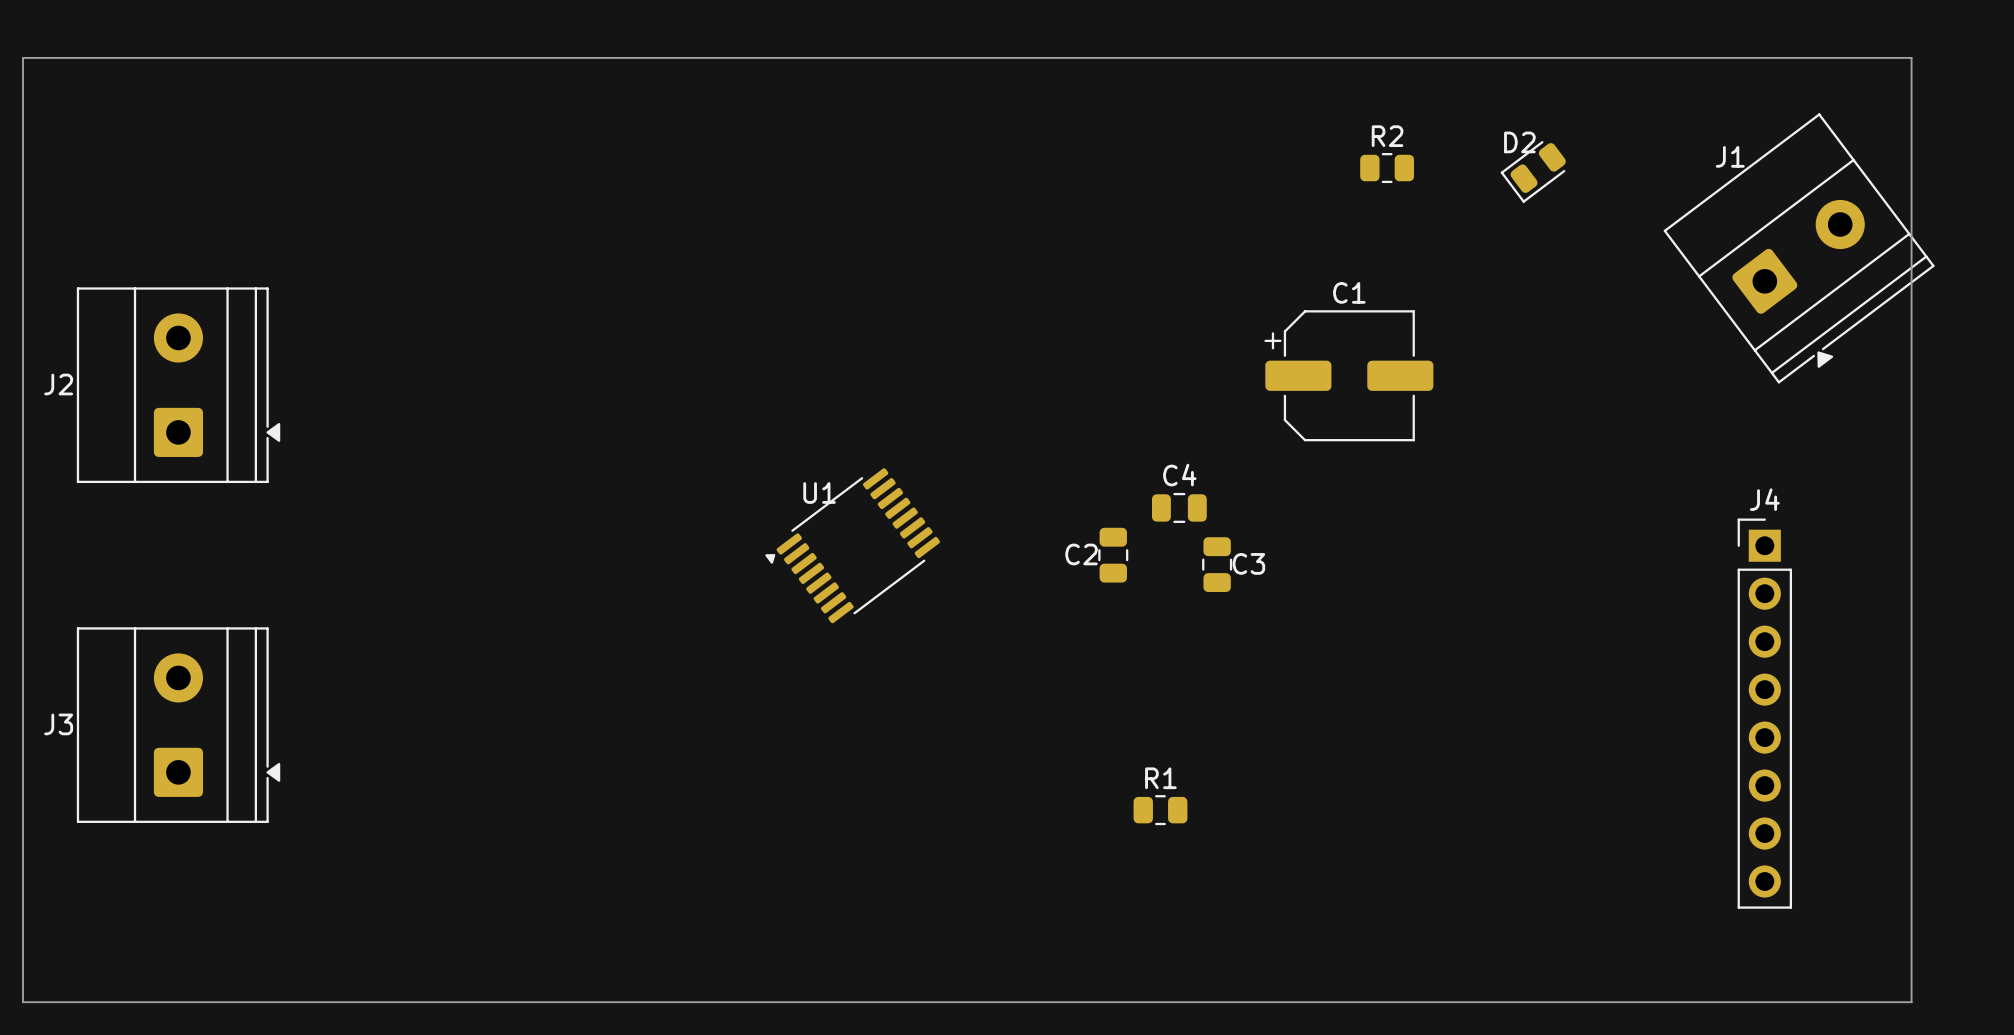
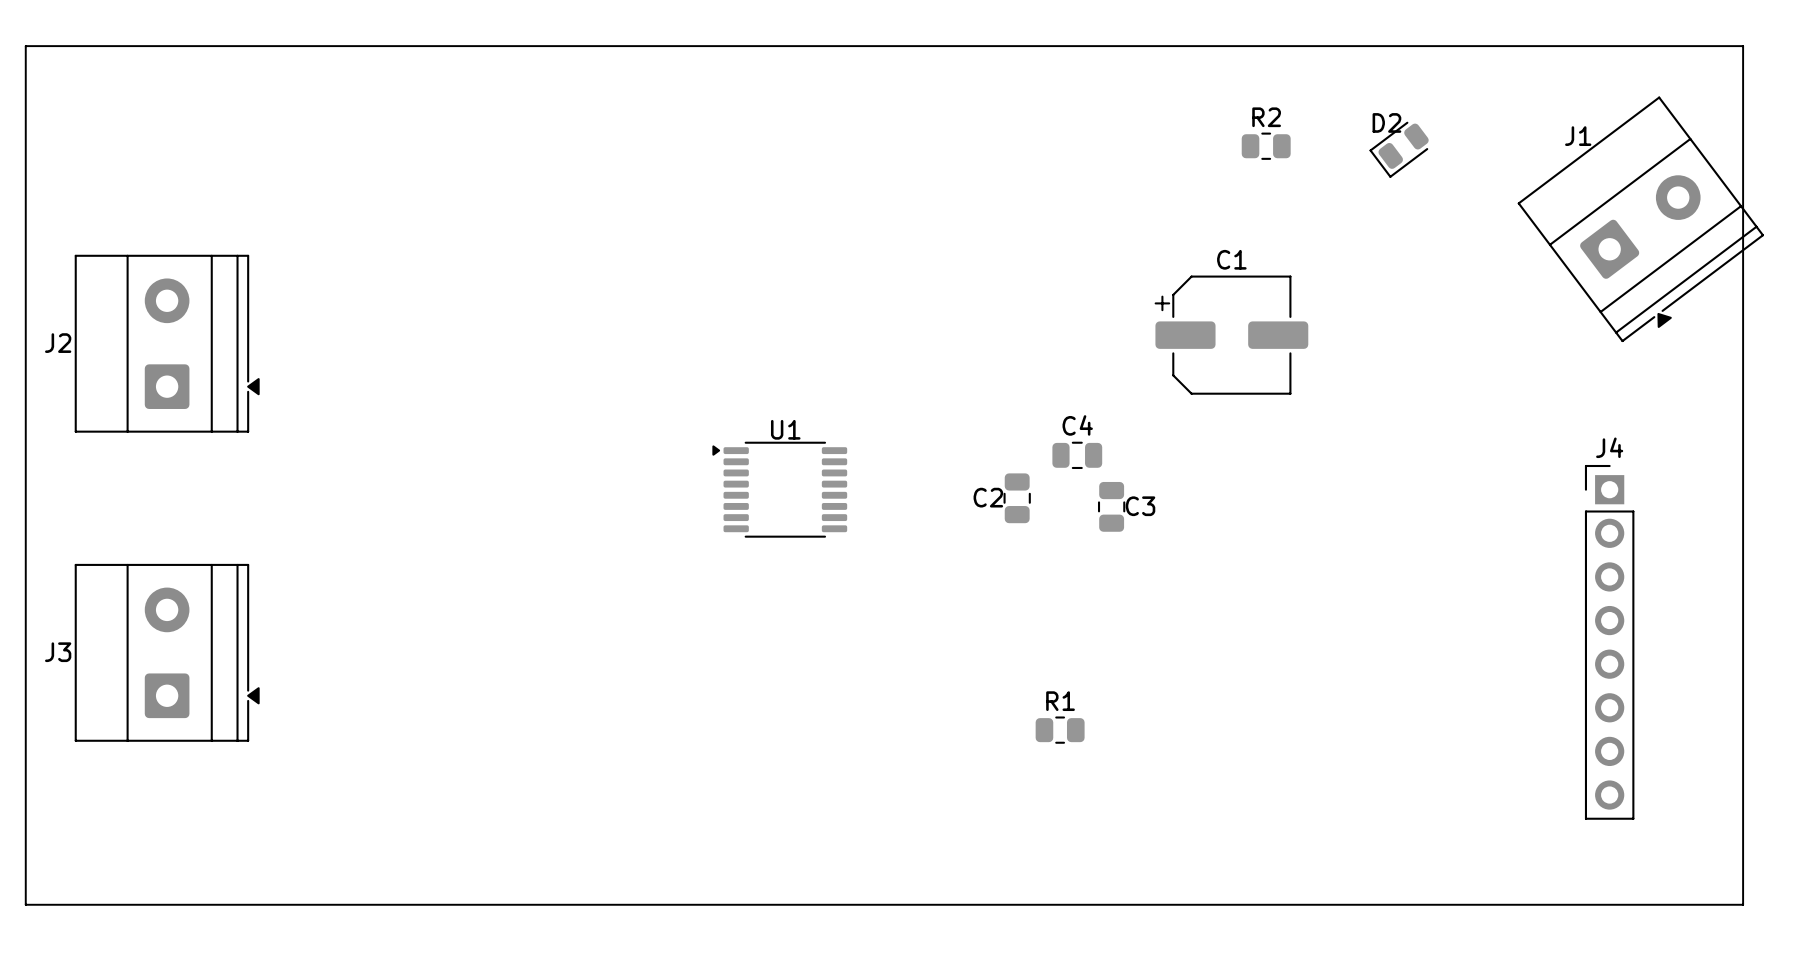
U1 rotation: 0° (852, 545) -> 37° clockwise (779, 489)

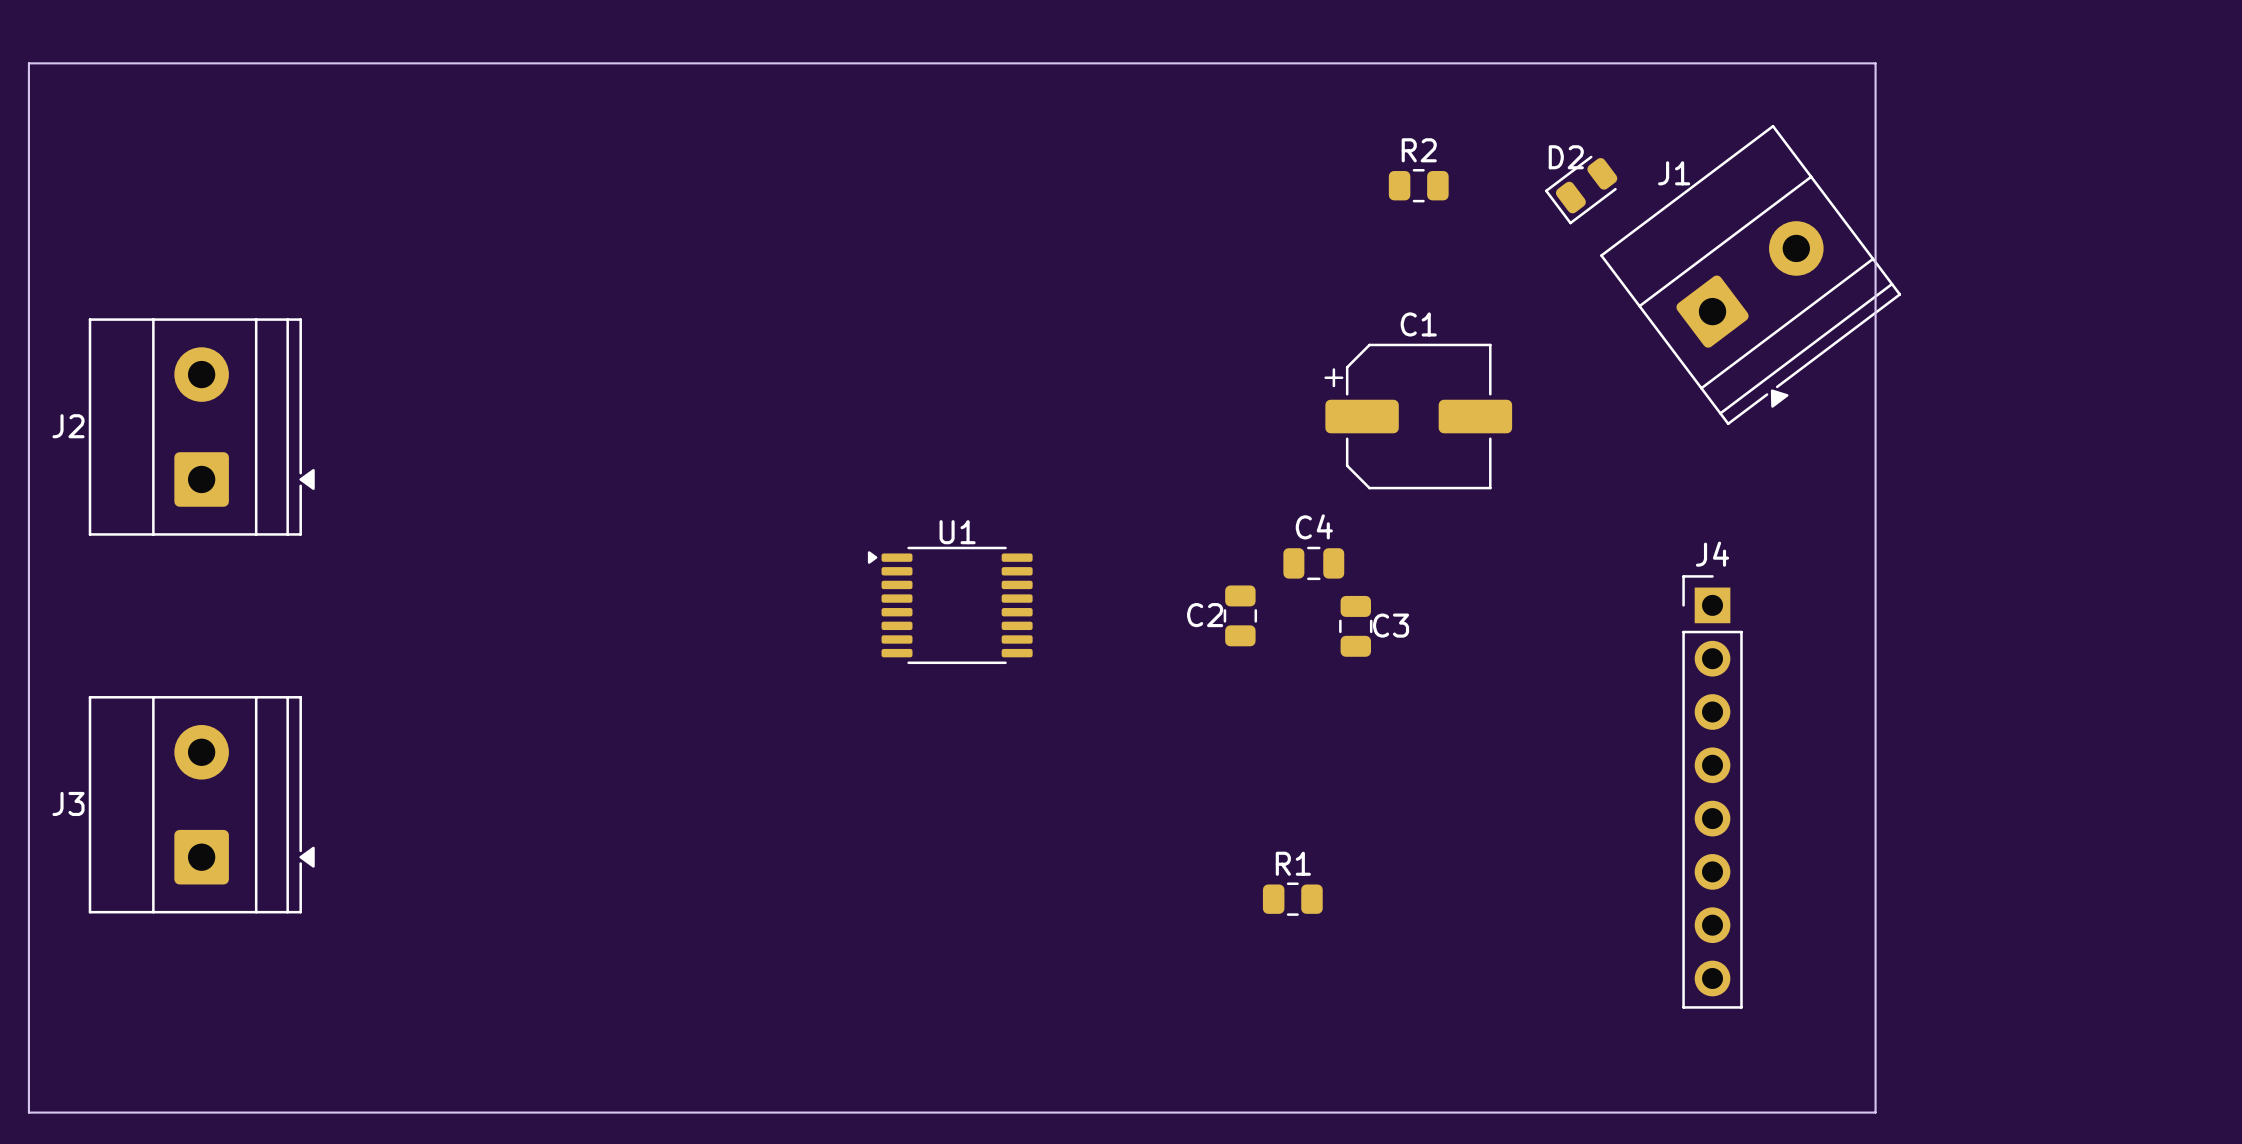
board edge: (1537, 46) (1743, 46) (1743, 904) (1537, 904) -> (1875, 63) (1875, 1112)
R2 position: (1266, 146) -> (1418, 185)
D2 position: (1399, 149) -> (1581, 190)
J1 position: (1640, 219) -> (1750, 275)
C1 position: (1231, 335) -> (1418, 416)
J4 position: (1609, 642) -> (1712, 791)

